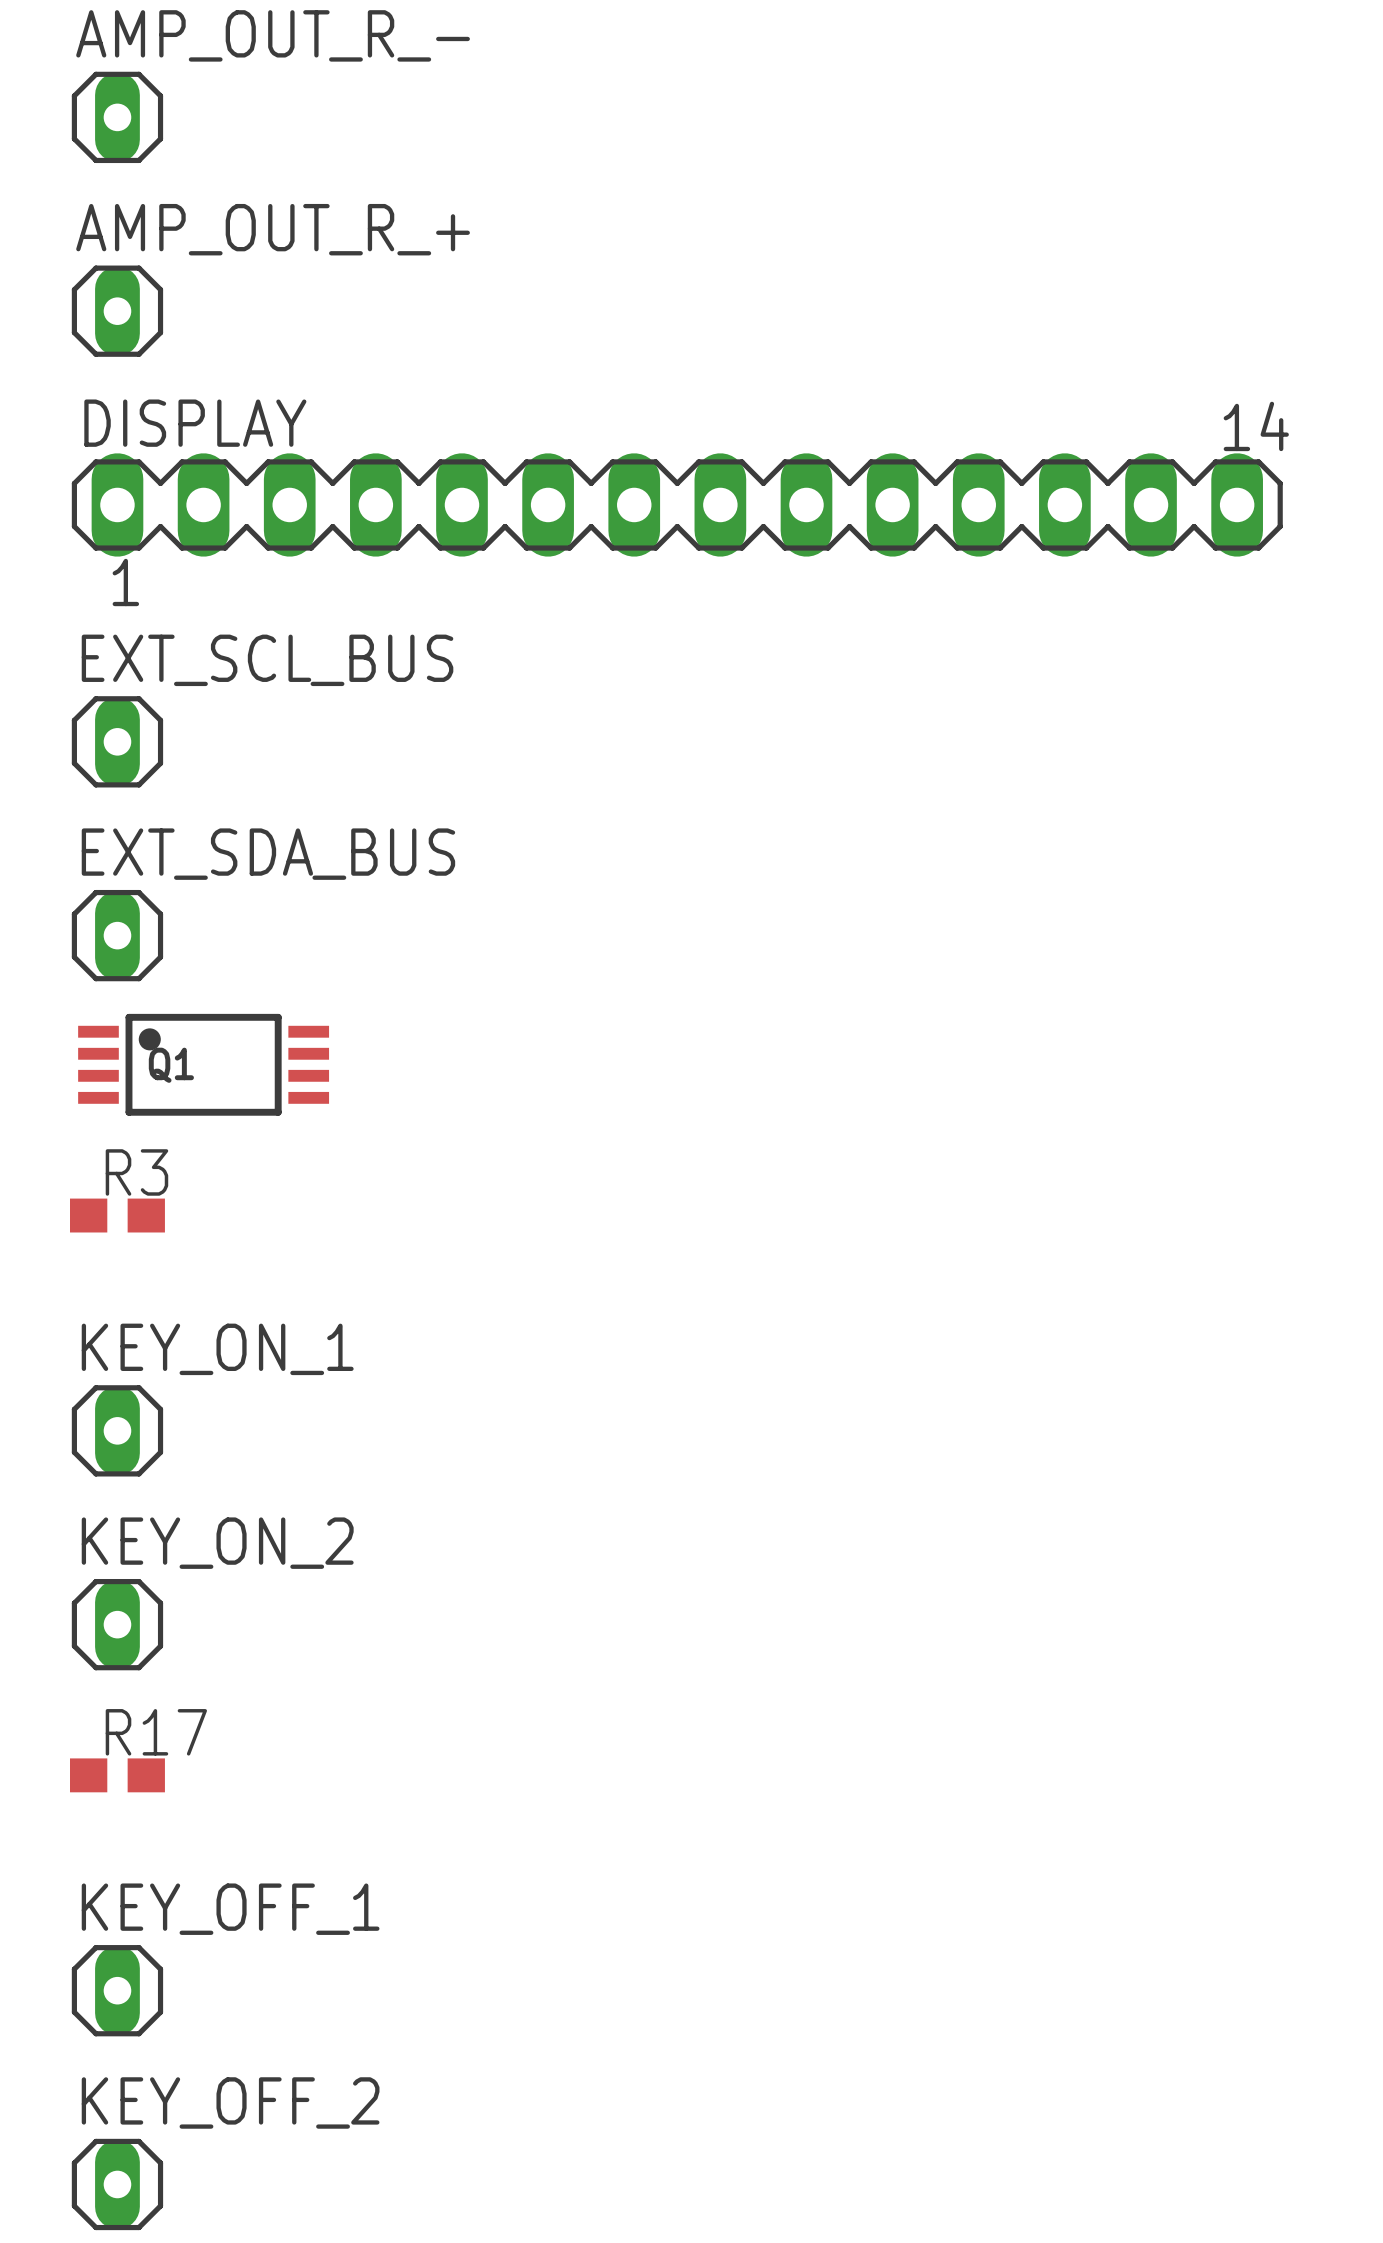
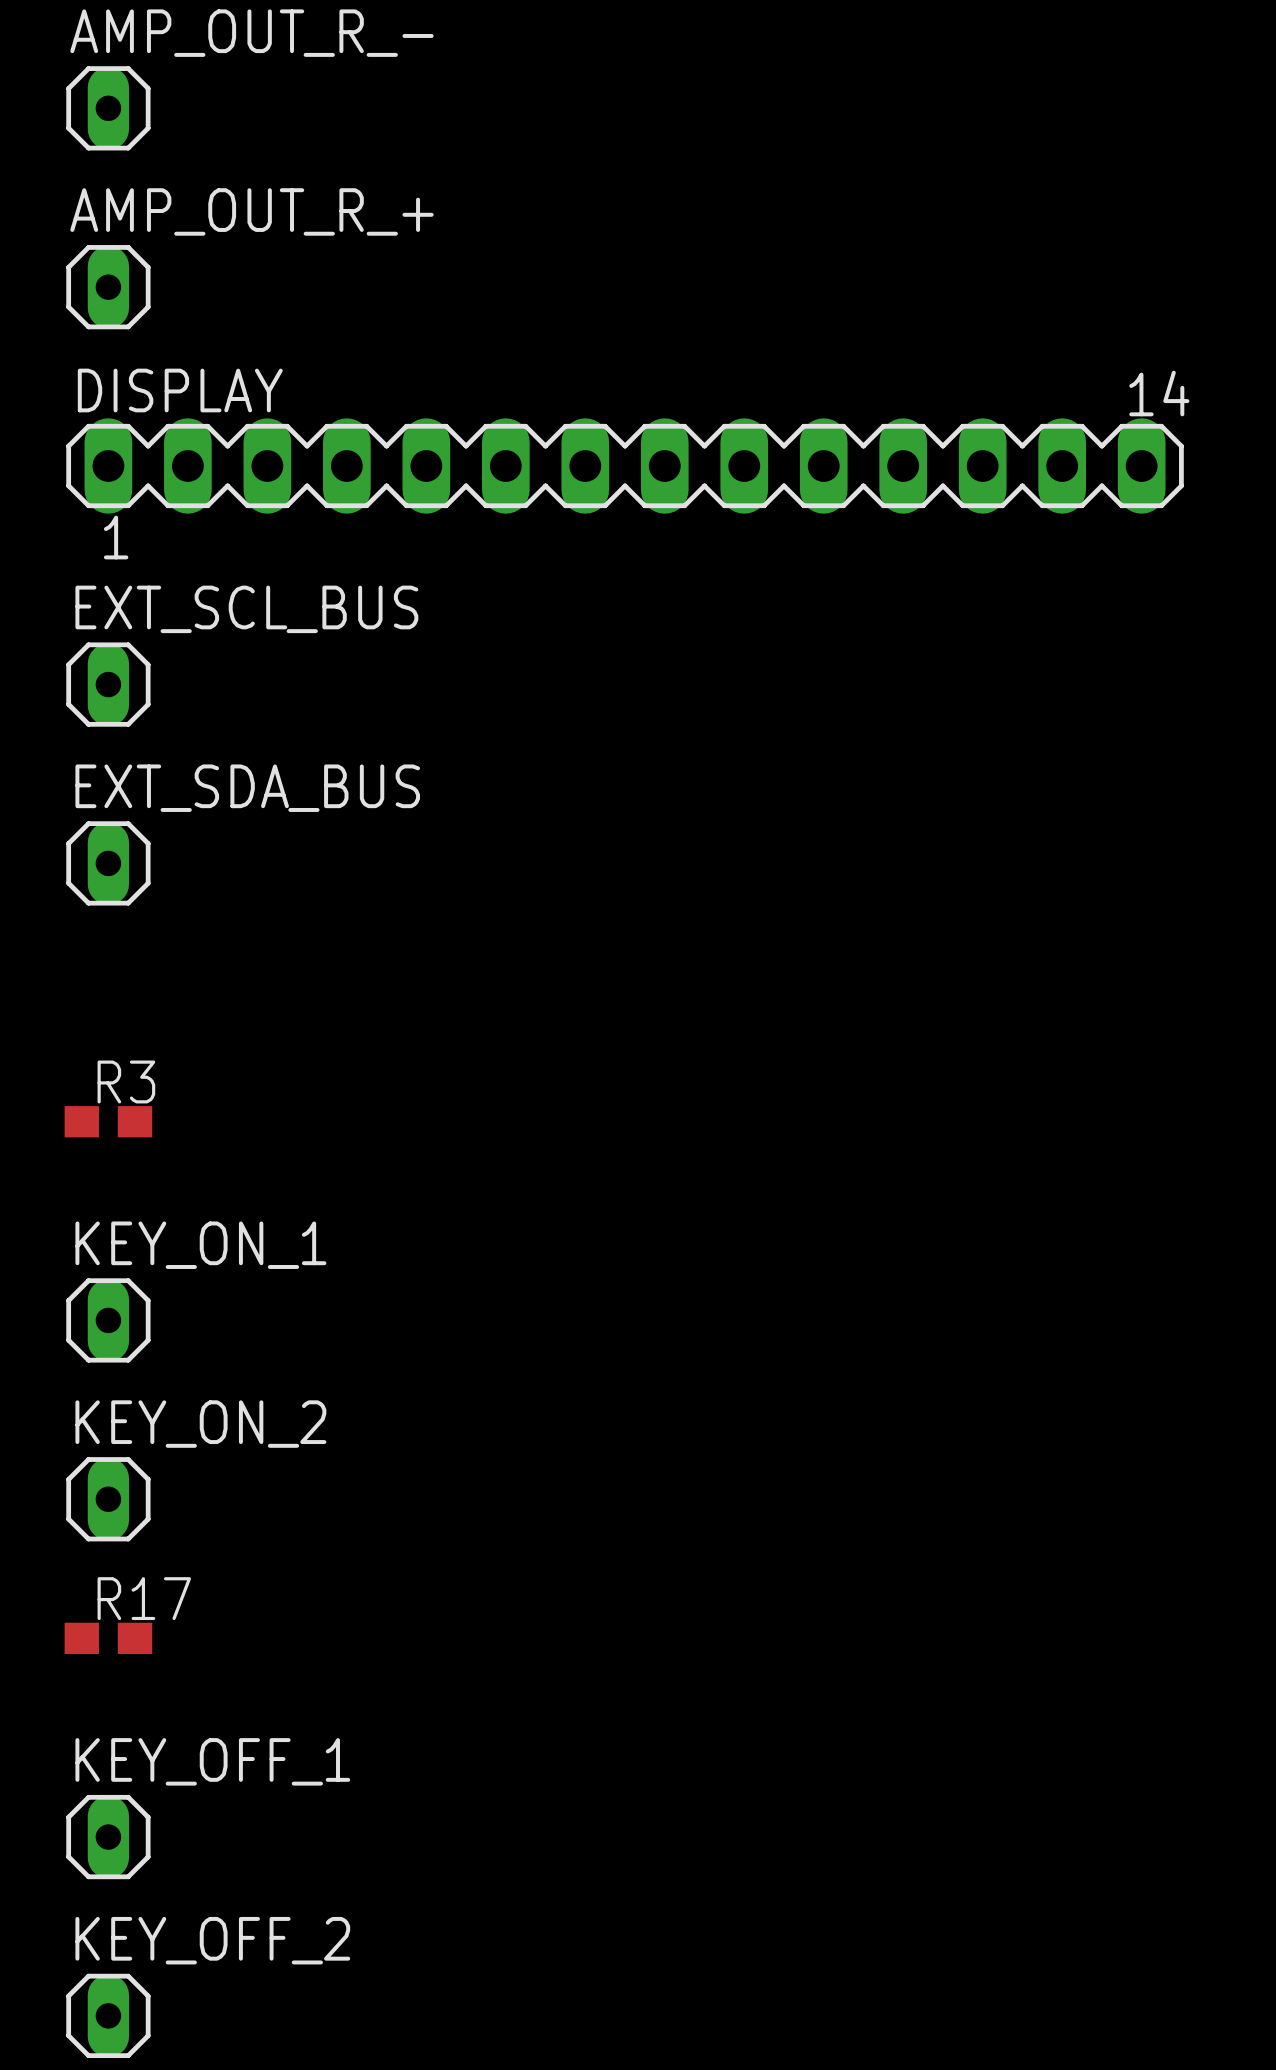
Q1: (203, 1064) -> none

